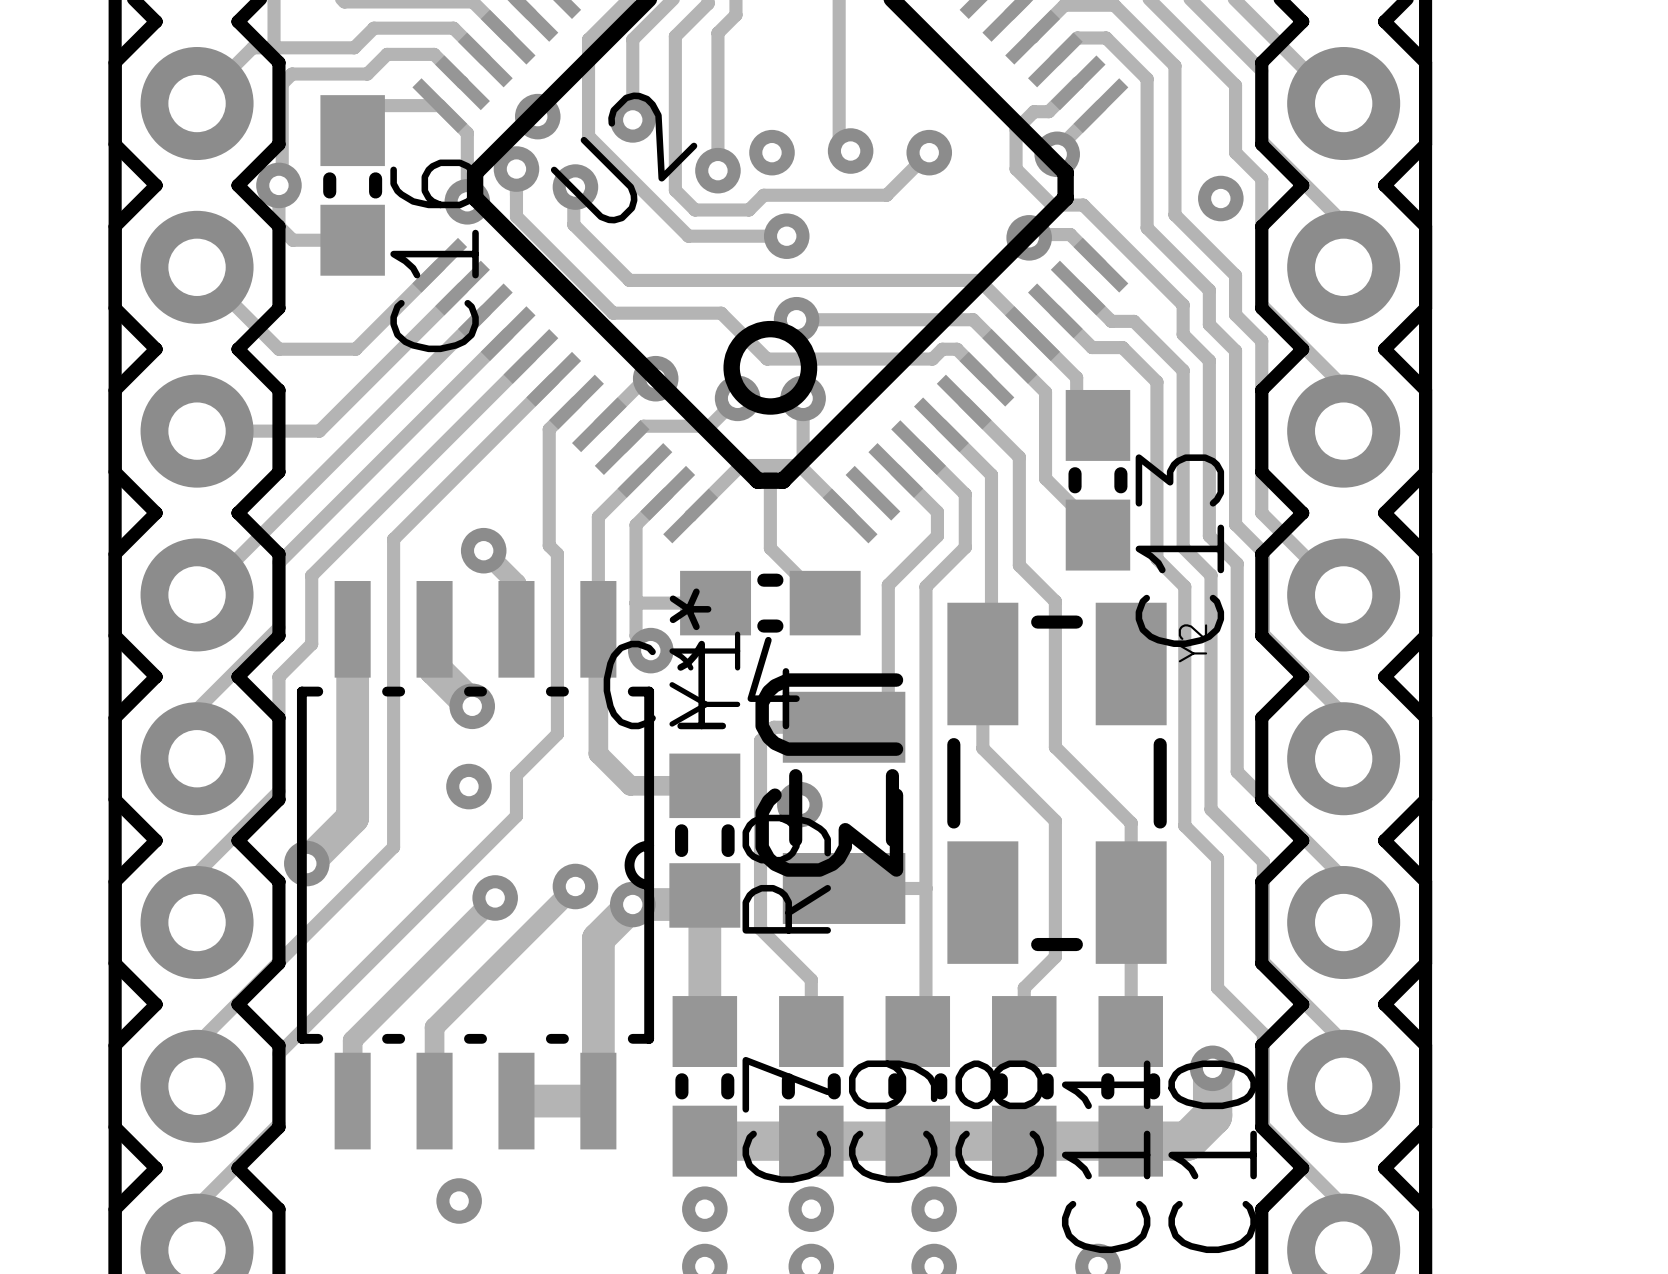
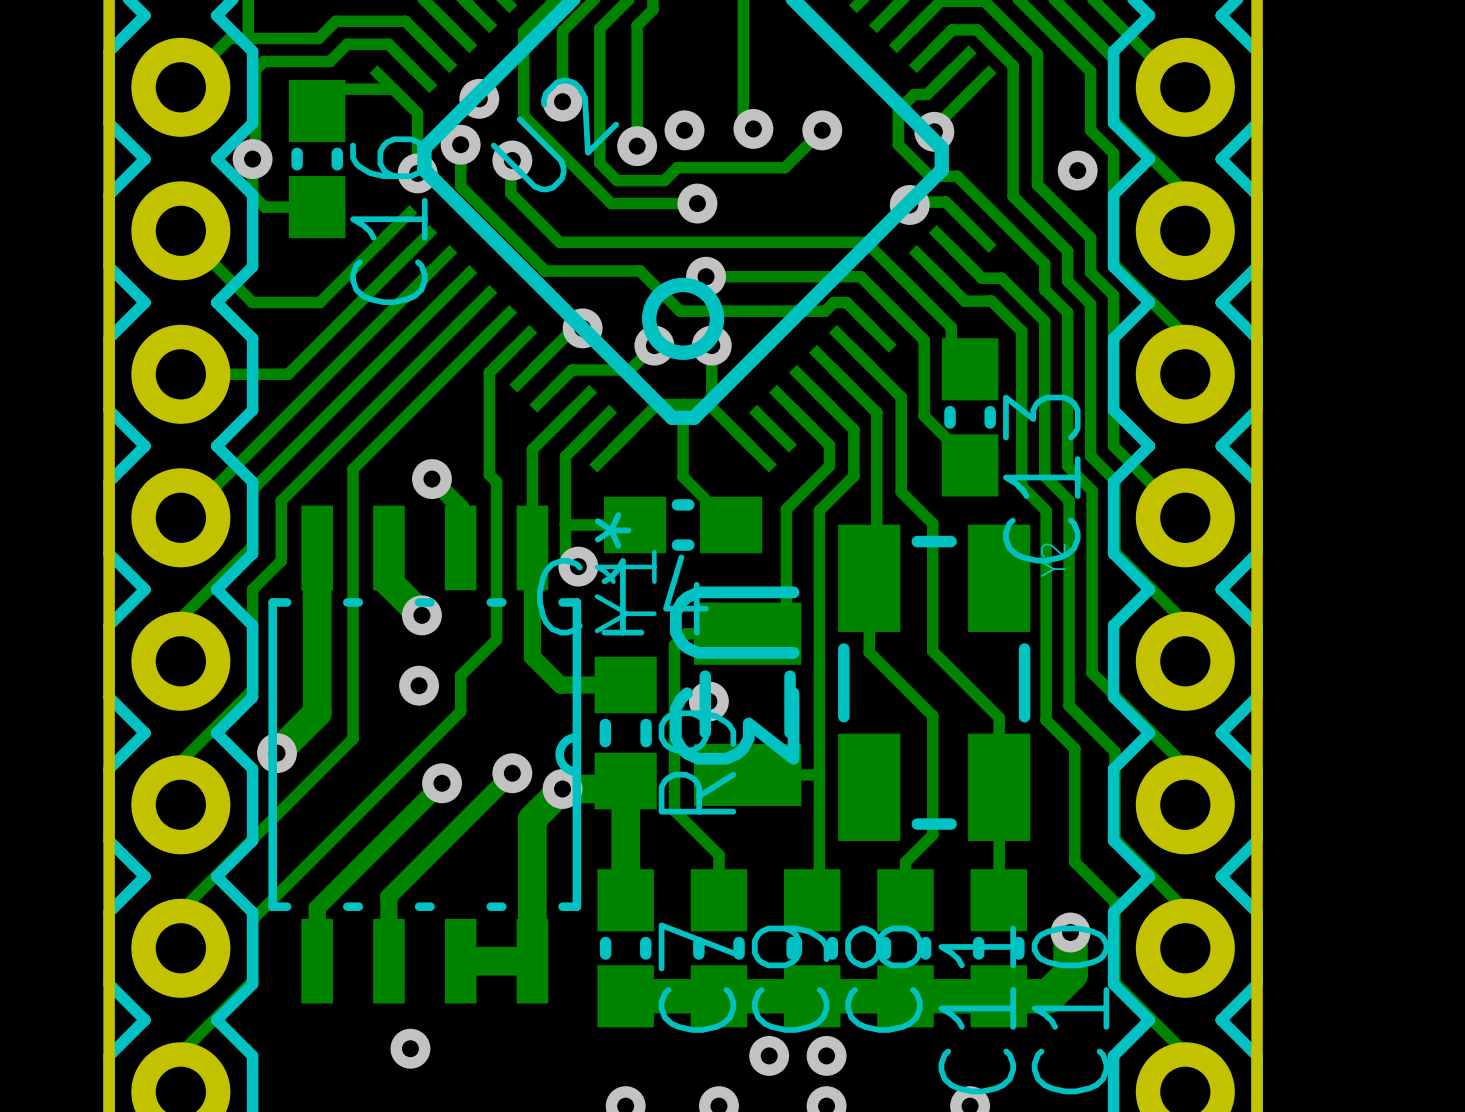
via: (704, 1209) -> none
via position: (811, 1209) -> (769, 1055)

